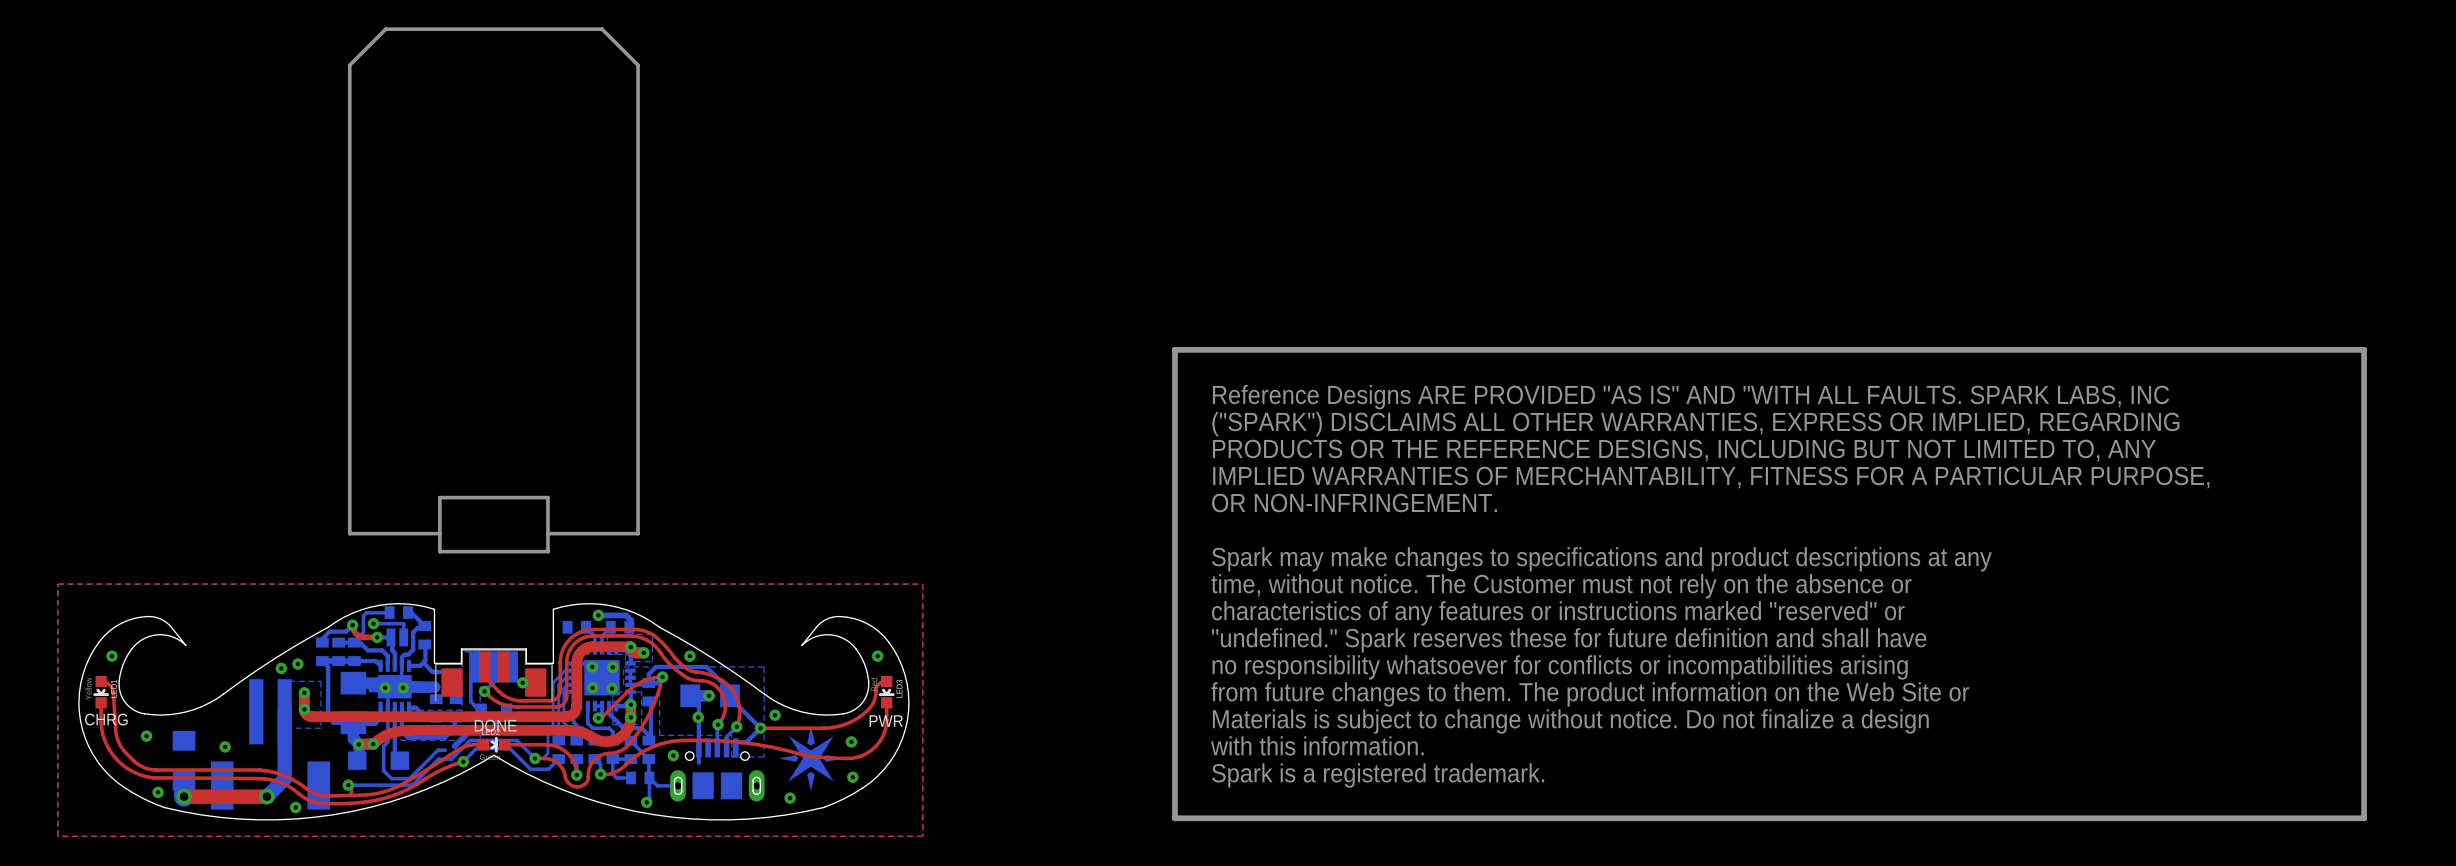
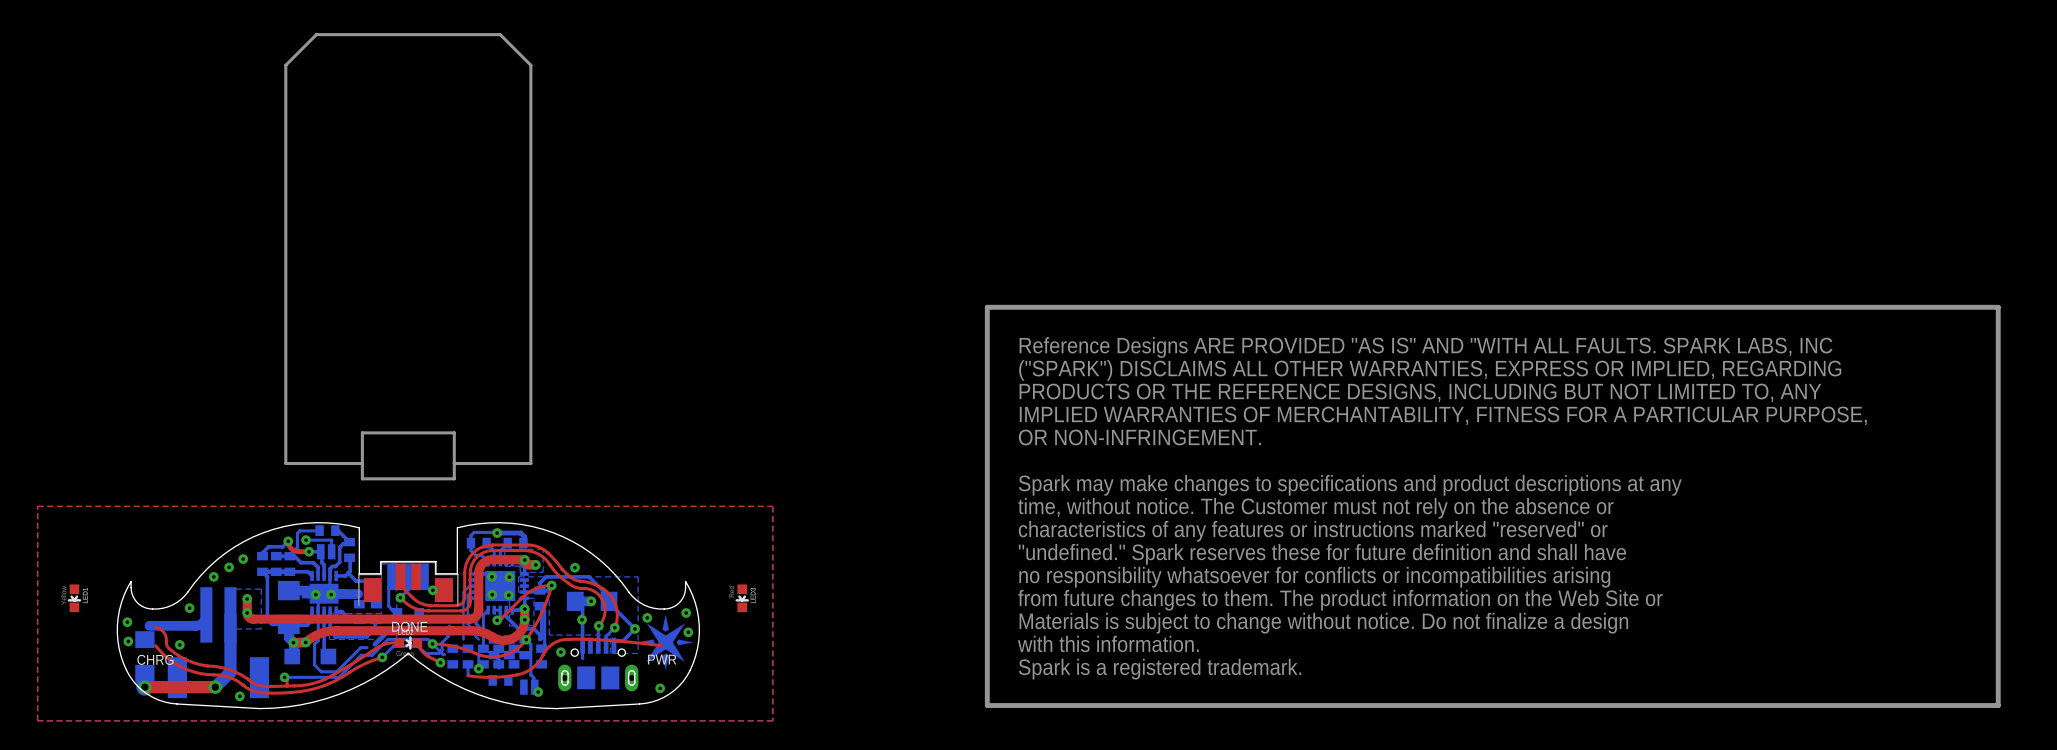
bottom track: none -> (497, 533) (474, 532) (470, 535) (470, 550) (475, 555) (481, 555) (488, 561)
via: none -> (243, 559)
via: none -> (229, 567)
via: (111, 656) -> none
via: (877, 656) -> none
board edge: (436, 663) (434, 663) (434, 609) (407, 604) (379, 605) (343, 617) (274, 658) (216, 698) (201, 706) (177, 713) (144, 713) (130, 707) (120, 692) (119, 675) (128, 653) (137, 642) (153, 635) (170, 636) (185, 645) (163, 620) (154, 617) (140, 617) (127, 620) (114, 627) (103, 636) (94, 649) (85, 665) (80, 683) (78, 701) (80, 720) (88, 746) (98, 762) (117, 782) (134, 793) (164, 807) (182, 811) (220, 817) (258, 819) (315, 817) (371, 806) (425, 789) (460, 773) (493, 755) (527, 773) (561, 789) (597, 801) (634, 811) (672, 817) (710, 819) (748, 819) (786, 814) (823, 807) (844, 798) (870, 782) (884, 769) (894, 754) (902, 737) (907, 720) (908, 701) (907, 683) (901, 665) (893, 649) (883, 636) (873, 627) (860, 620) (846, 617) (833, 617) (823, 620) (802, 645) (816, 636) (834, 635) (849, 642) (859, 653) (867, 675) (867, 692) (857, 707) (843, 713) (810, 713) (785, 706) (771, 698) (713, 658) (643, 617) (608, 605) (580, 604) (553, 609) (553, 663) (551, 663) -> (359, 573) (359, 527) (316, 522) (284, 526) (243, 541) (216, 560) (201, 575) (184, 596) (167, 607) (149, 608) (139, 604) (132, 595) (131, 581) (121, 602) (117, 625) (119, 648) (123, 663) (137, 685) (147, 694) (164, 701) (259, 708) (300, 705) (339, 694) (375, 676) (408, 653) (429, 669) (465, 689) (503, 702) (543, 708) (652, 701) (669, 694) (679, 685) (693, 663) (697, 648) (699, 625) (695, 602) (685, 581) (683, 595) (677, 604) (666, 608) (649, 607) (632, 596) (615, 575) (599, 560) (573, 541) (532, 526) (500, 522) (457, 527) (457, 573)
via: (297, 664) -> none
via: none -> (213, 576)
via: (281, 668) -> none
bottom track: (565, 670) (553, 682) (553, 728) (547, 733) (547, 753) (542, 758) (535, 758) -> none
top track: (662, 677) (653, 703) (635, 736) (622, 749) (601, 754) (595, 758) (589, 766) (588, 779) (584, 784) (577, 786) (569, 783) (561, 767) (554, 760) (535, 758) -> (551, 585) (545, 604) (531, 631) (523, 643) (512, 652) (498, 656) (489, 656) (454, 646) (432, 643)
top track: (101, 681) (108, 684) (112, 690) (118, 741) (126, 753) (140, 765) (156, 770) (268, 771) (292, 779) (313, 793) (329, 795) -> (155, 627) (164, 633) (168, 648) (180, 657) (200, 664) (228, 669) (257, 684) (268, 686)
top track: (886, 681) (881, 682) (877, 686) (874, 701) (868, 709) (847, 723) (829, 727) (760, 728) -> none
bottom track: none -> (540, 606) (544, 610) (544, 645) (541, 648)
top track: (101, 702) (101, 726) (106, 745) (118, 761) (134, 772) (153, 777) (266, 779) (287, 785) (299, 794) -> (155, 645) (164, 655) (181, 667) (200, 673) (229, 677) (242, 685)
top track: (886, 702) (886, 724) (881, 738) (871, 750) (857, 757) (815, 756) (755, 744) (704, 740) -> (661, 645) (587, 639)
via: none -> (189, 608)
bottom track: (587, 706) (587, 723) (592, 728) (609, 728) (612, 731) (612, 740) -> (487, 610) (483, 614) (483, 648)
via: none -> (686, 613)
bottom track: none -> (206, 614) (203, 622) (196, 625) (149, 625)
text position: CHRG (106, 719) -> CHRG (155, 659)
via: none -> (127, 622)
text position: PWR (886, 721) -> PWR (662, 659)
via: none -> (688, 632)
via: (146, 736) -> none
bottom track: (630, 740) (648, 759) (648, 777) (657, 785) (677, 785) -> none
bottom track: none -> (526, 639) (530, 644) (530, 674) (533, 677) (534, 687)
via: none -> (526, 639)
top track: (682, 740) (651, 747) (637, 754) (617, 770) (608, 774) (600, 774) -> (568, 639) (558, 640) (550, 645) (535, 665) (521, 673) (492, 677) (468, 675)
via: (851, 741) -> none
via: none -> (128, 641)
top track: (504, 744) (546, 744) (558, 747) (570, 756) (575, 767) (576, 775) -> (417, 643) (425, 654) (440, 662)
bottom track: (504, 748) (509, 748) (530, 769) (548, 769) (558, 759) -> (417, 646) (426, 653) (438, 653) (442, 650) (442, 642) (448, 636) (449, 626)
part: (558, 749) -> none
part: (576, 749) -> none
part: (648, 749) -> none
via position: (535, 758) -> (432, 643)
drawing position: (811, 758) -> (665, 642)
bottom track: (630, 759) (612, 759) (612, 774) (616, 777) (630, 777) -> none
part: none -> (452, 656)
part: none -> (468, 656)
part: none -> (483, 656)
part: none -> (498, 656)
part: none -> (514, 656)
part: none -> (541, 656)
bottom track: none -> (468, 664) (468, 675)
via position: (600, 774) -> (440, 662)
part: (640, 777) -> none
bottom track: (649, 777) (649, 799) (646, 802) -> none
via: (852, 777) -> none
part: none -> (500, 680)
via: (158, 792) -> none
part: none -> (529, 687)

